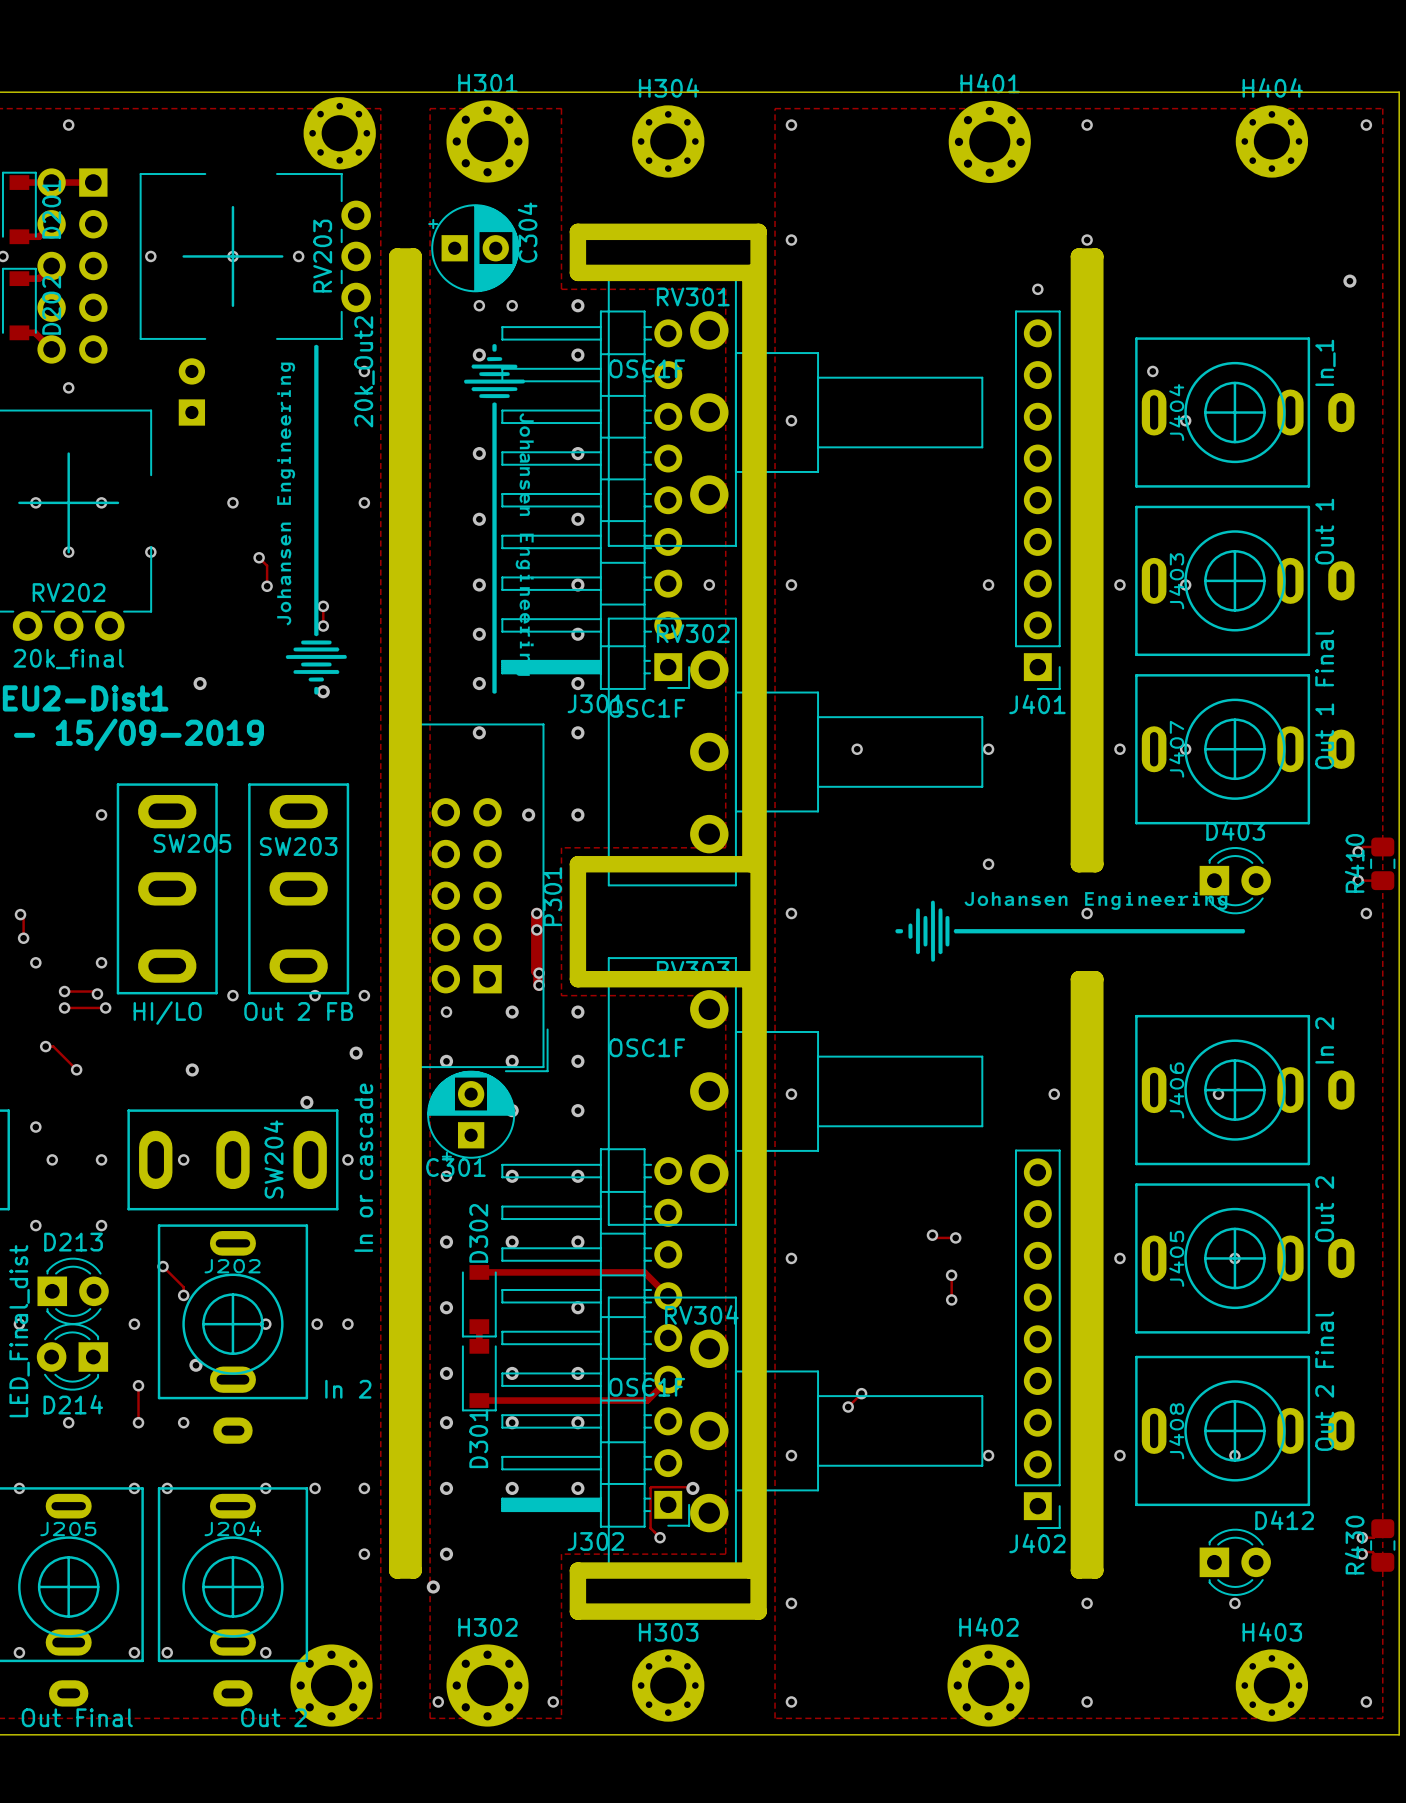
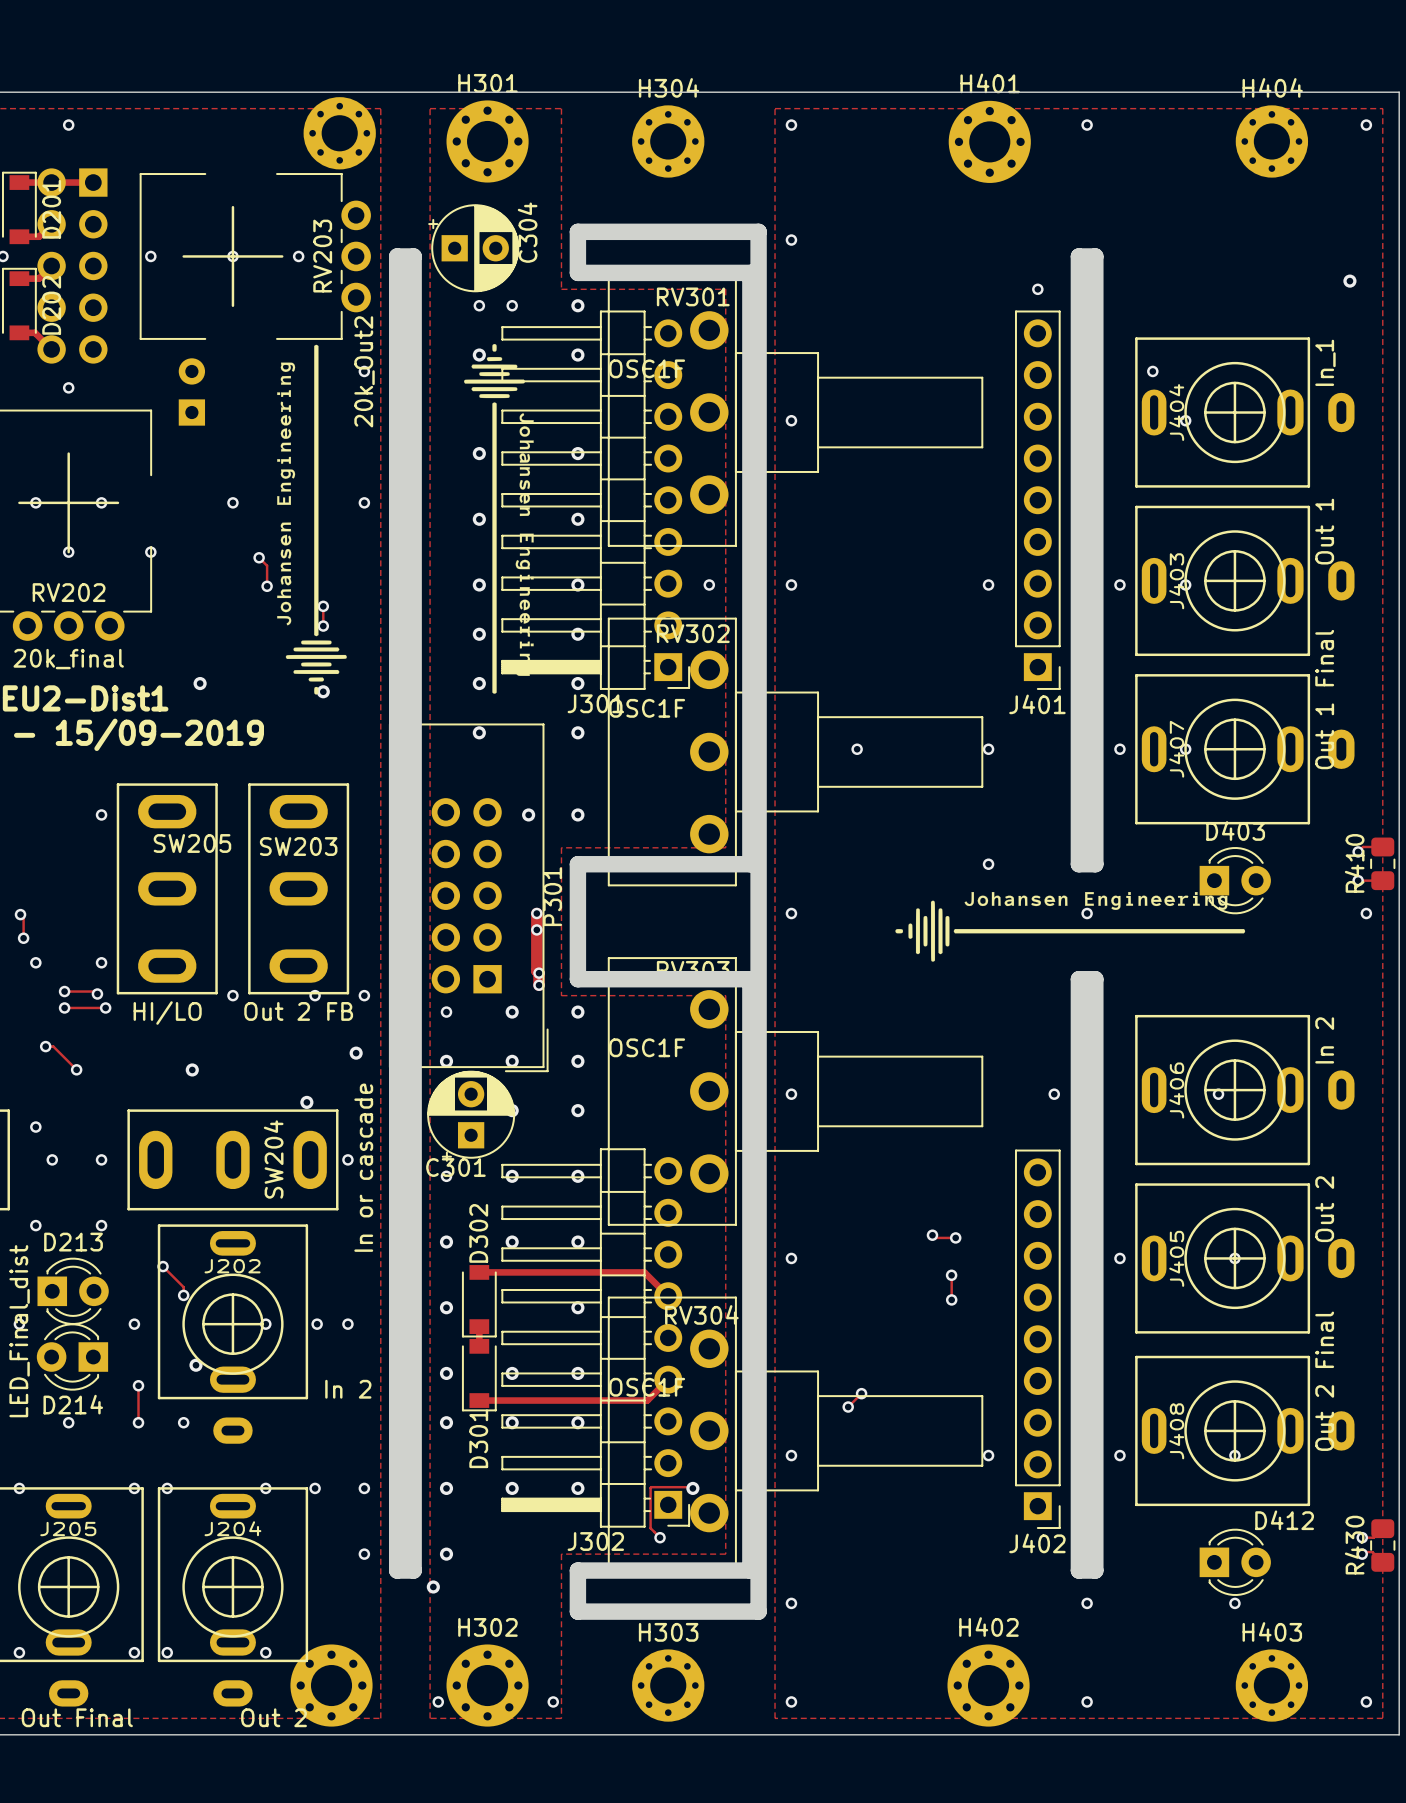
via: (1087, 240) -> none
via: (183, 1159) -> none

